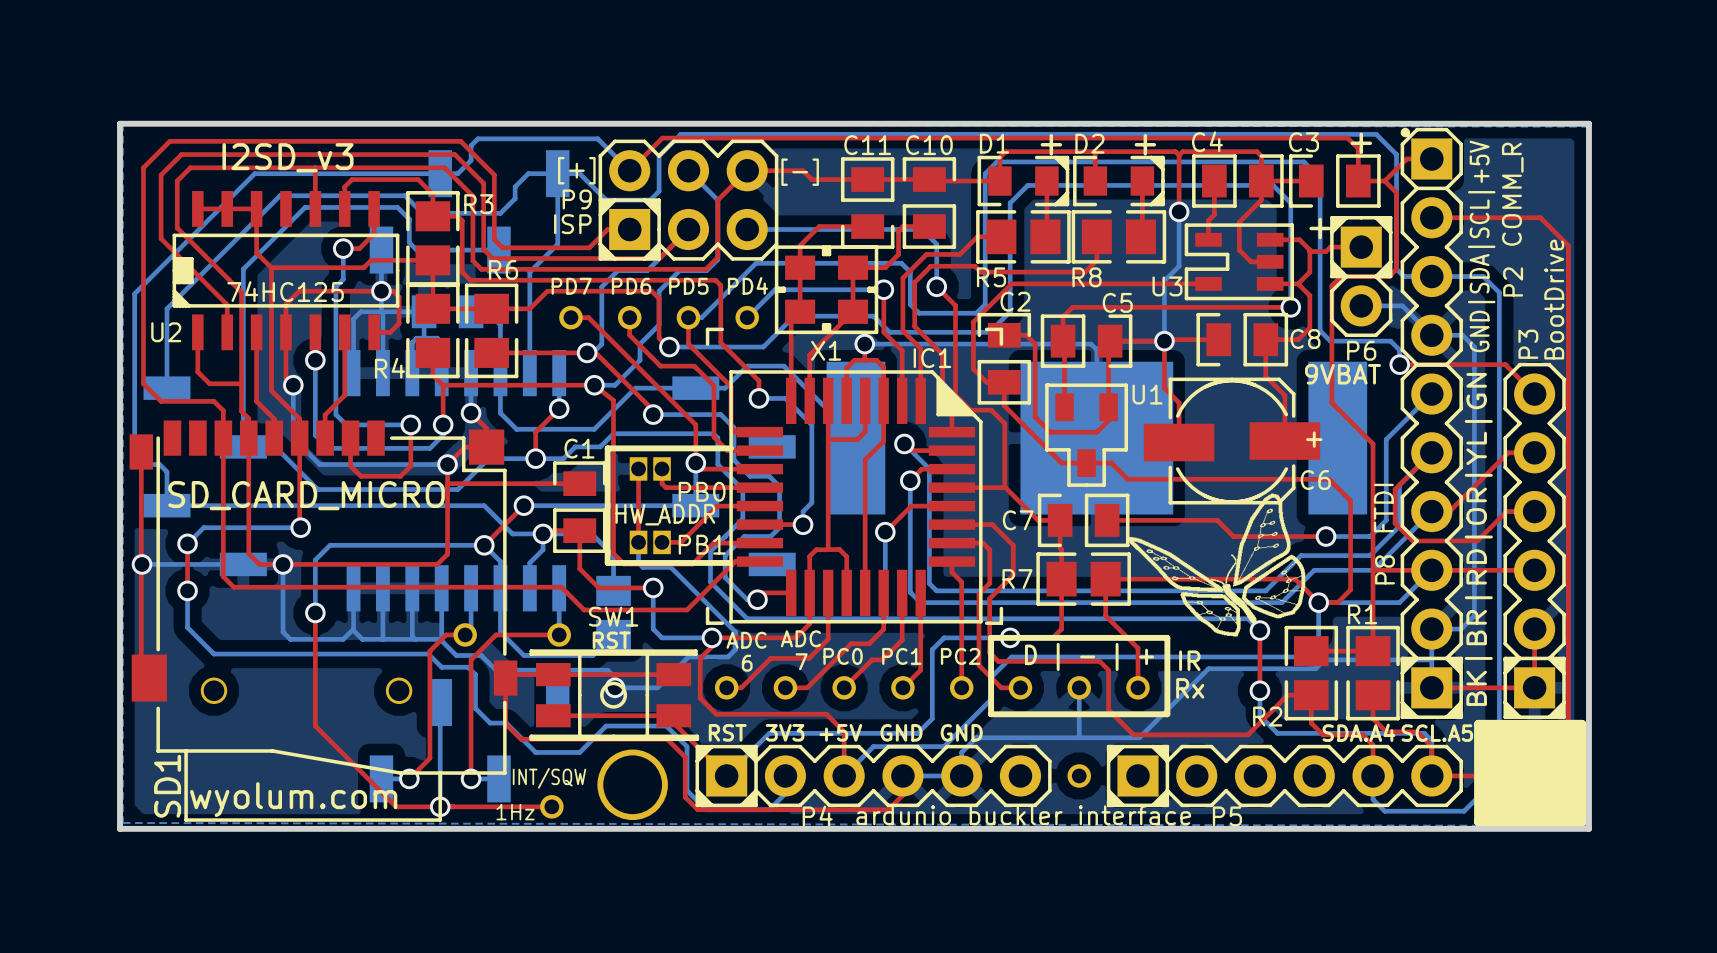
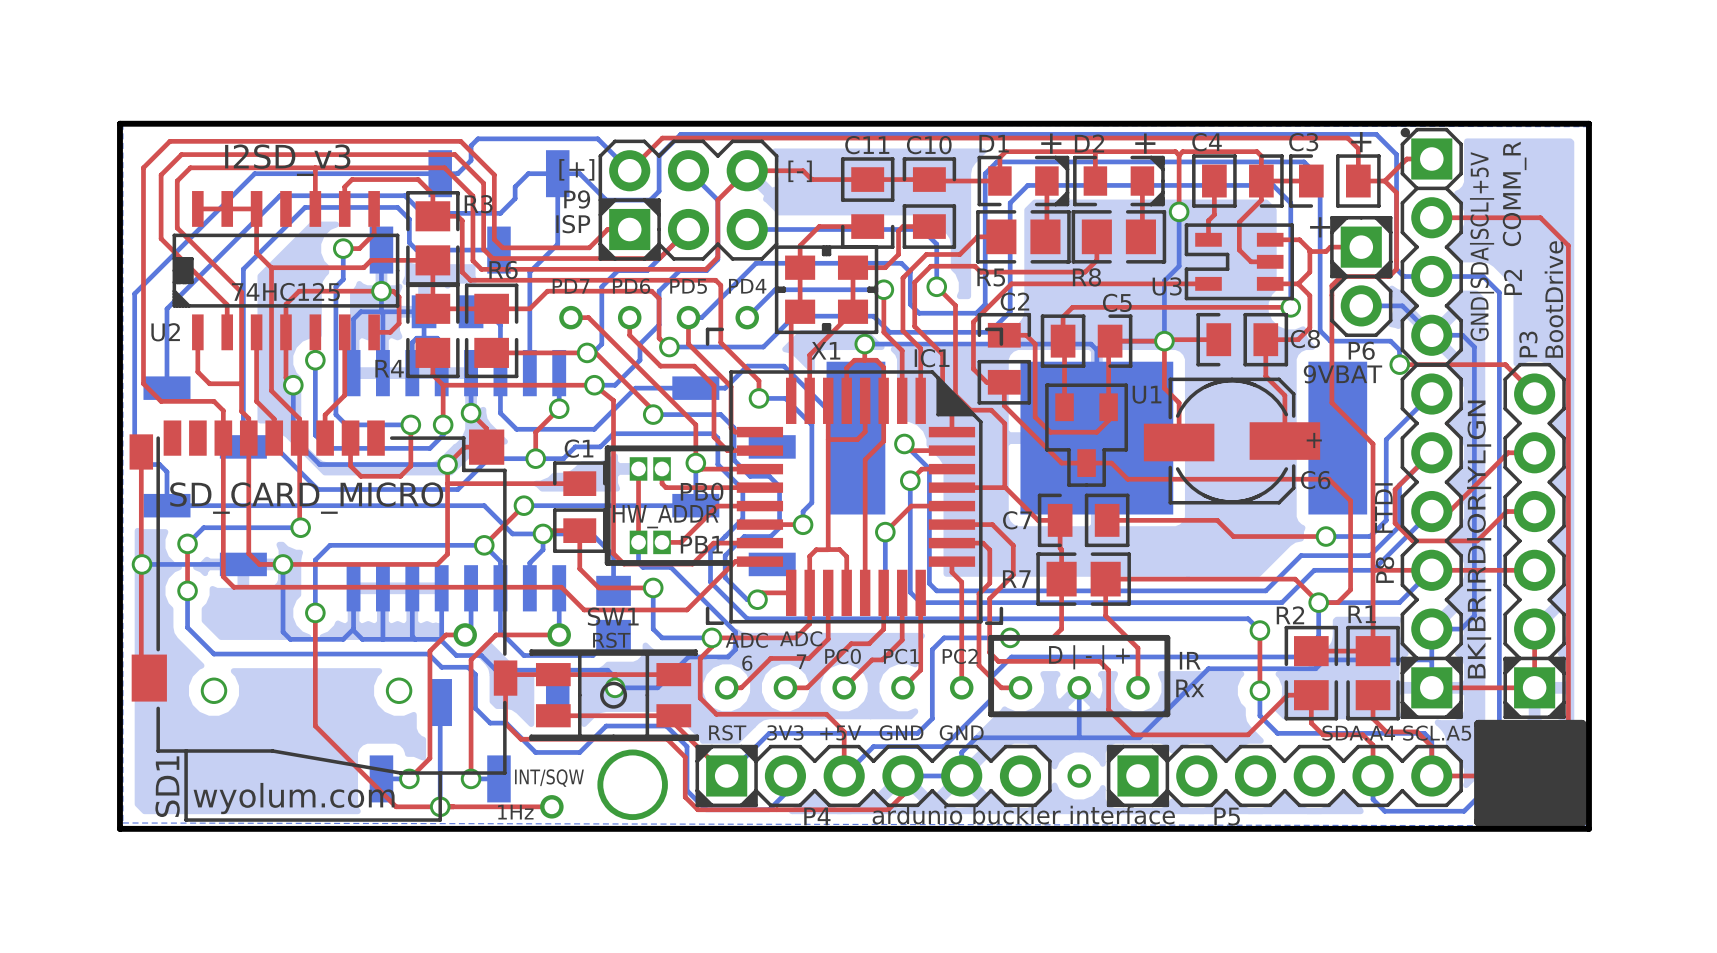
drawing: [1127, 493, 1306, 637] -> none
R2 name position: R2 (1267, 716) -> R2 (1290, 615)

